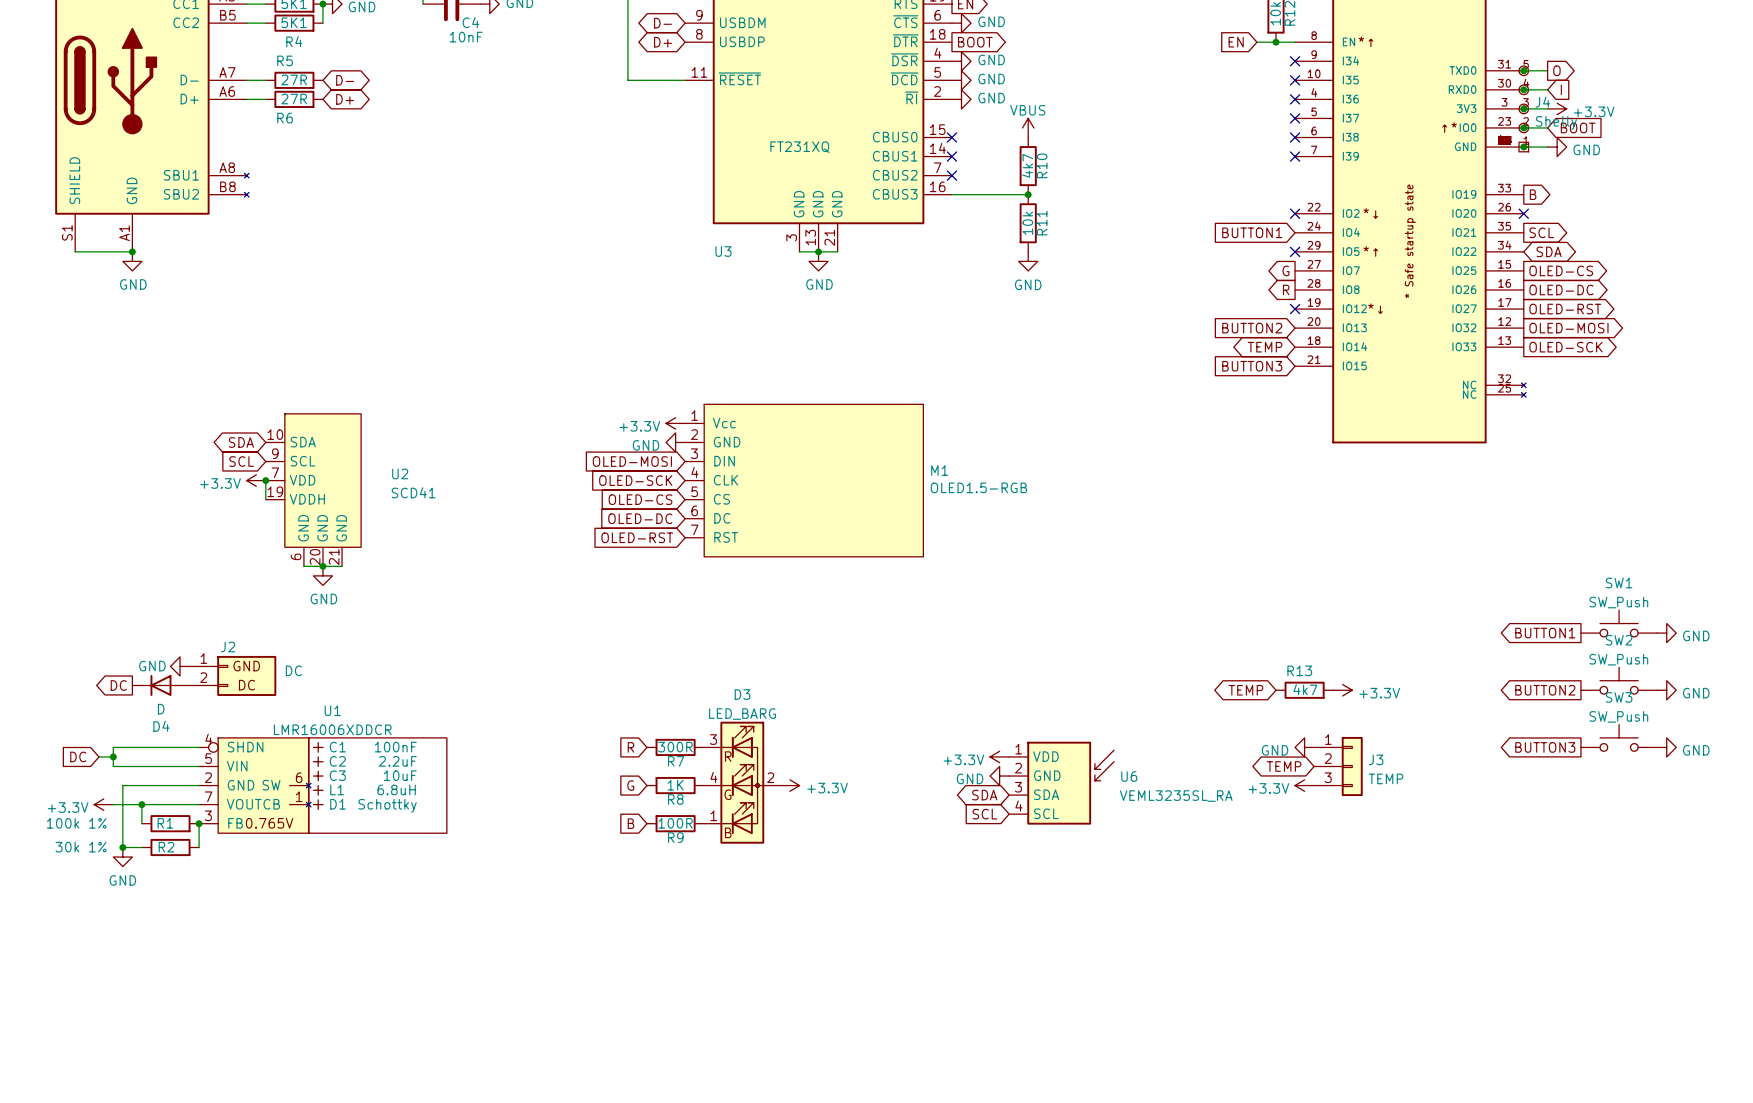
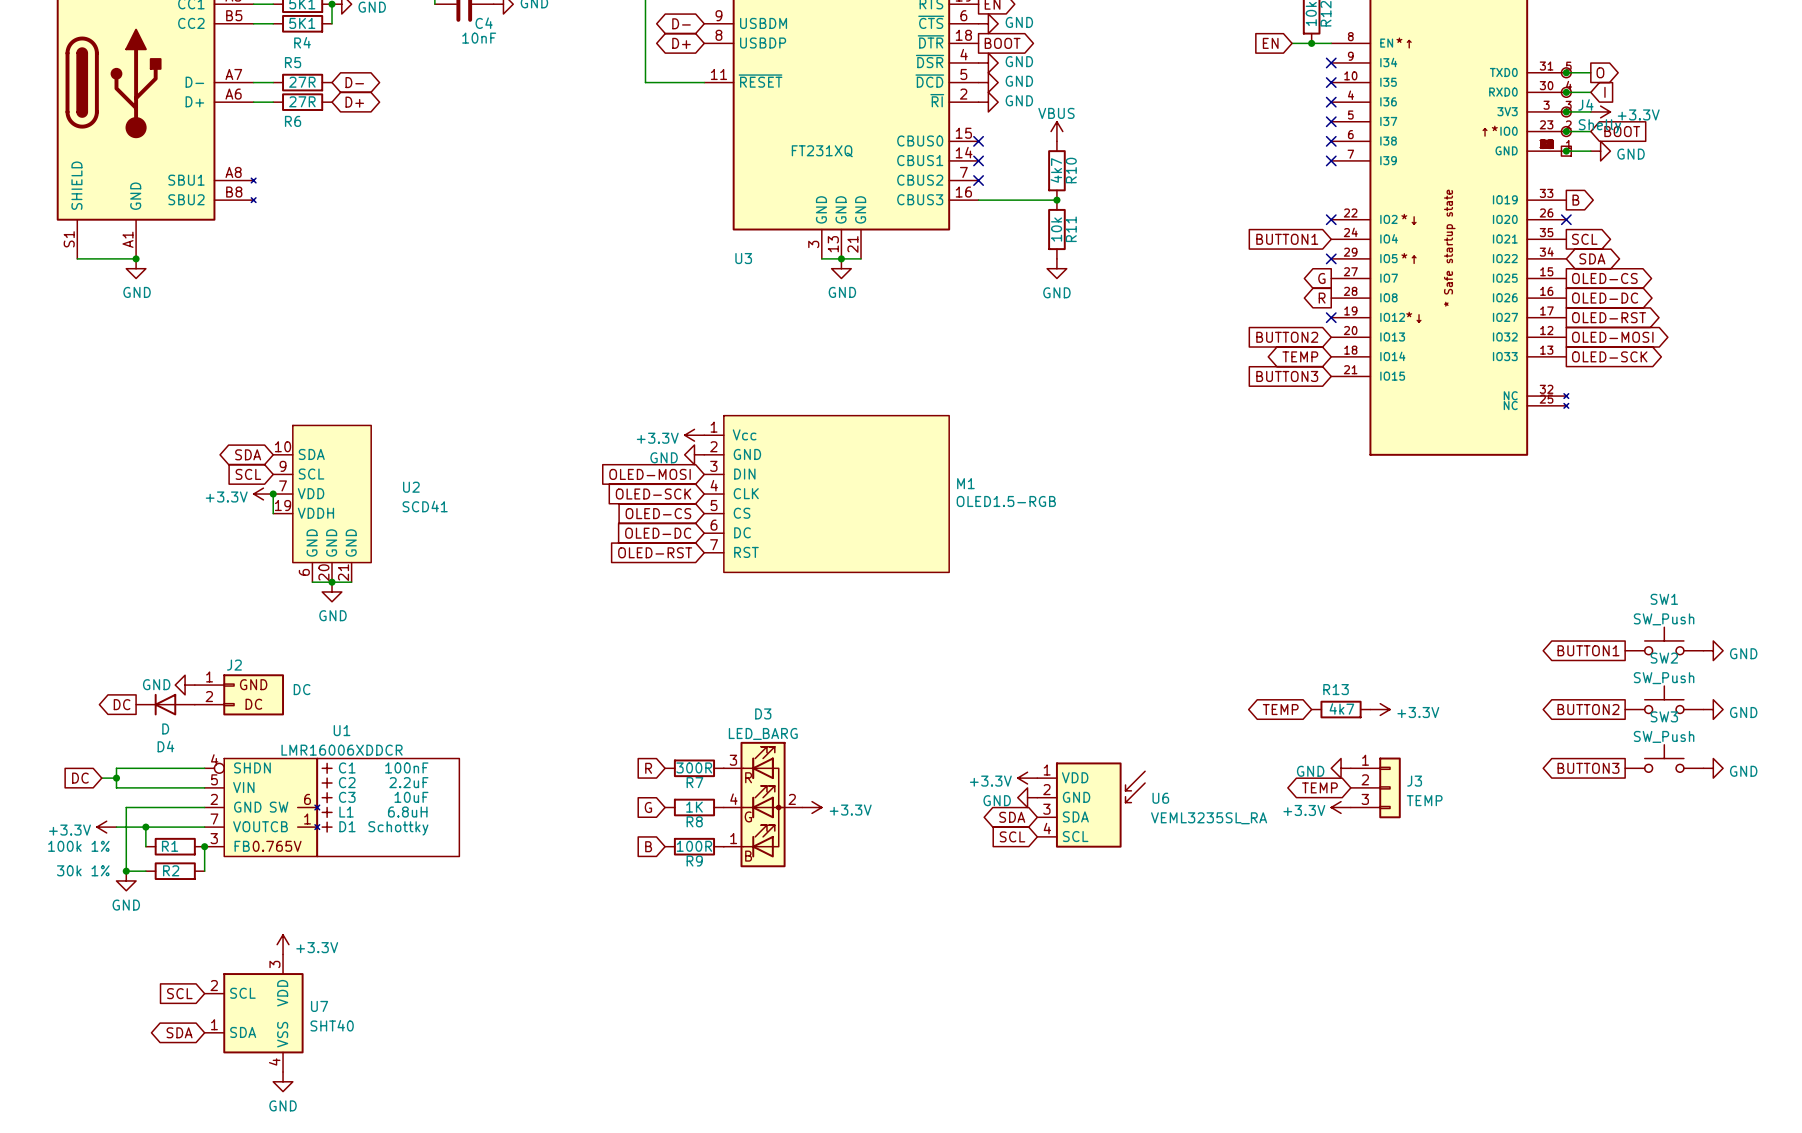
power symbol: none -> +3.3V (283, 944)
global label: none -> SCL (179, 993)
U7: none -> SHT40 (254, 1013)
global label: none -> SDA (179, 1032)
power symbol: none -> GND (283, 1081)

